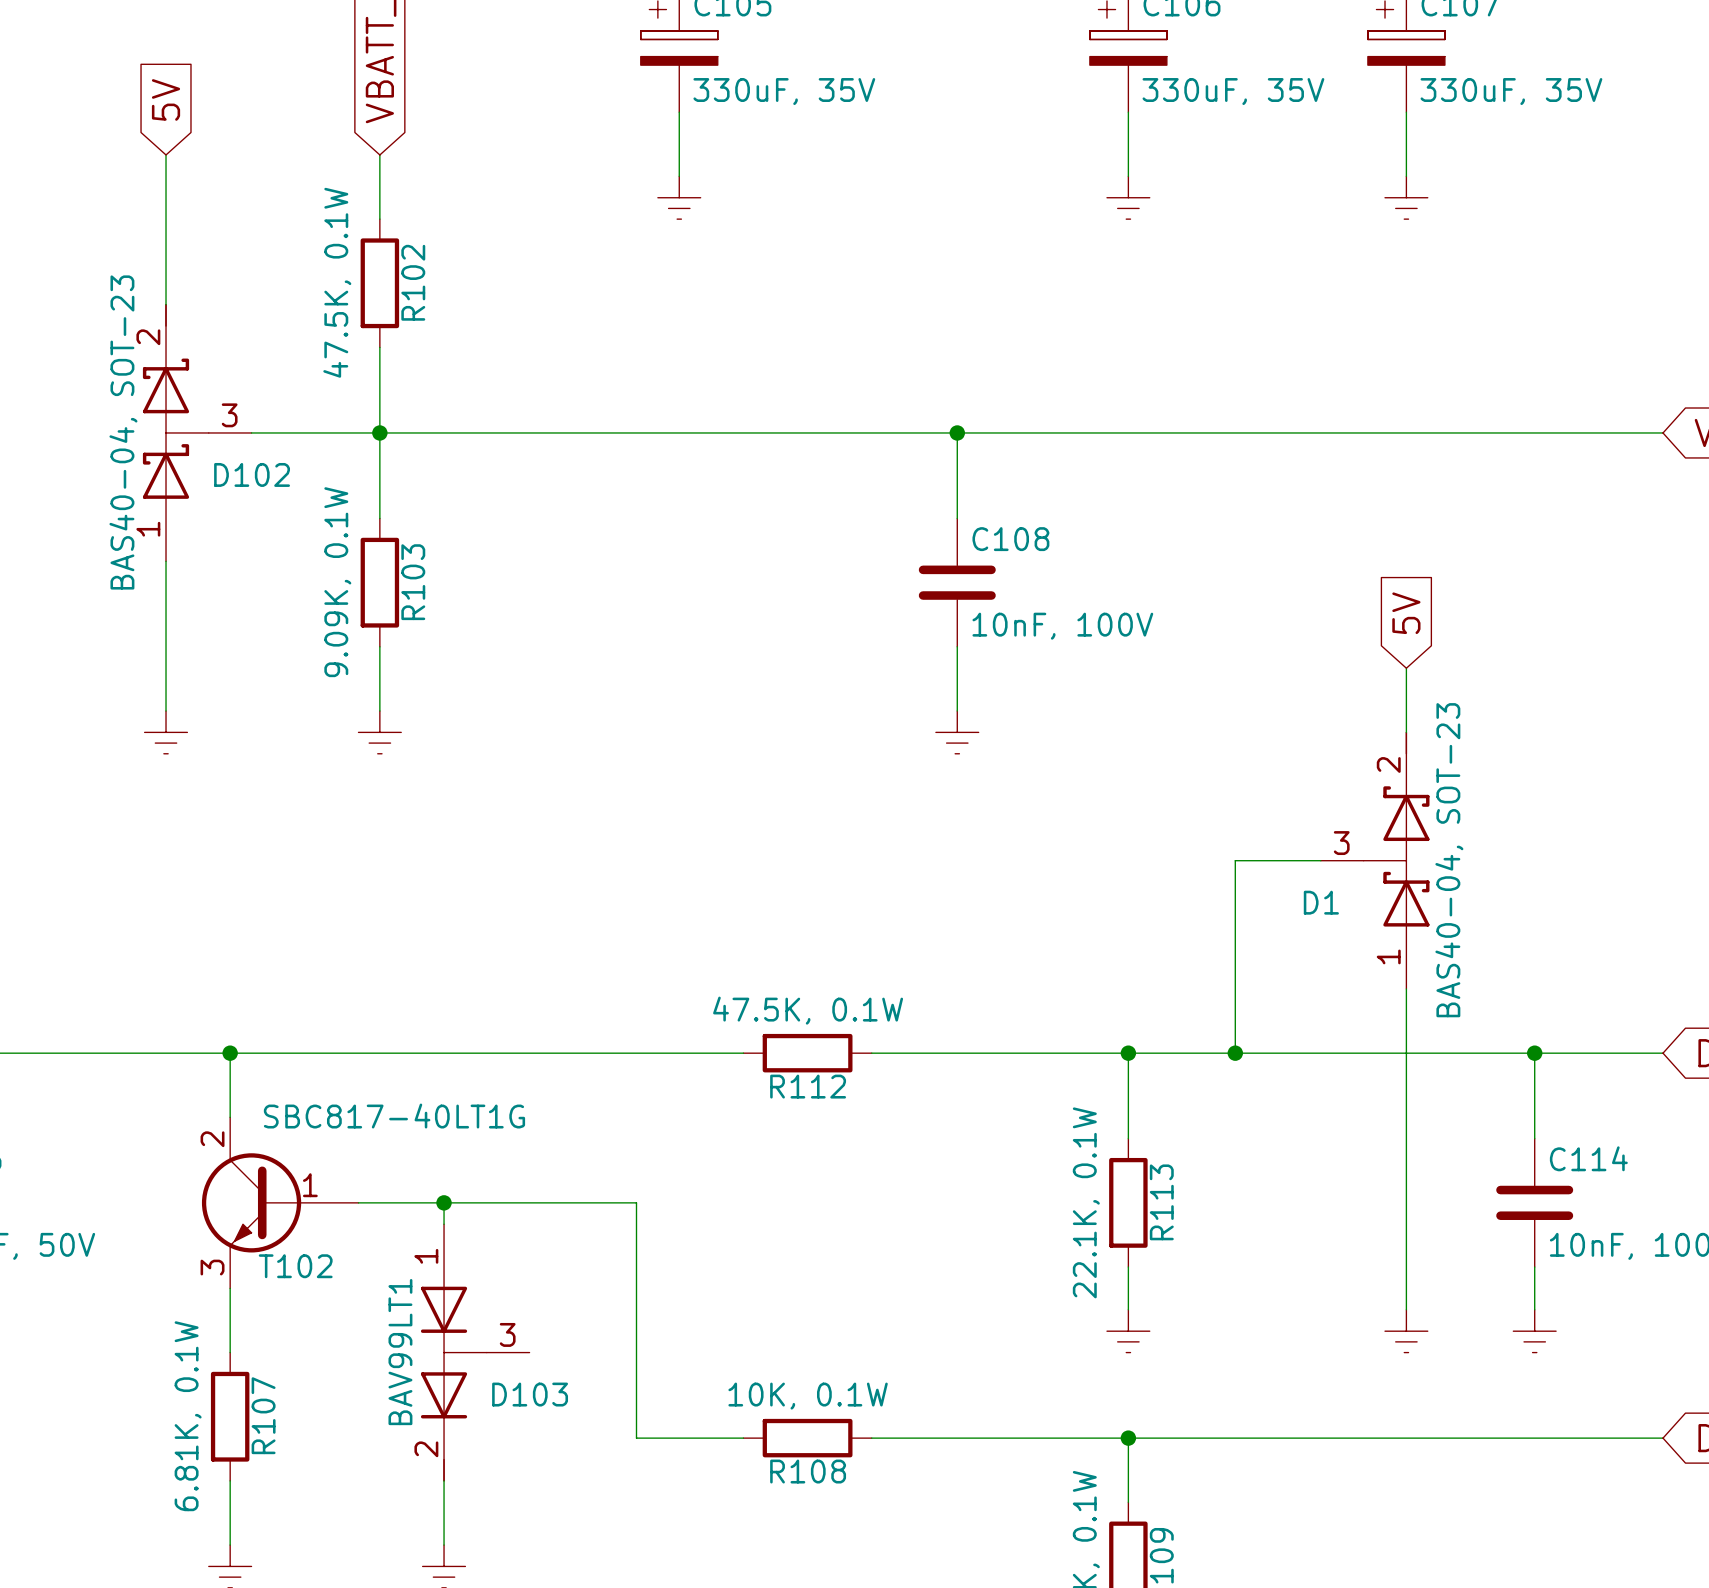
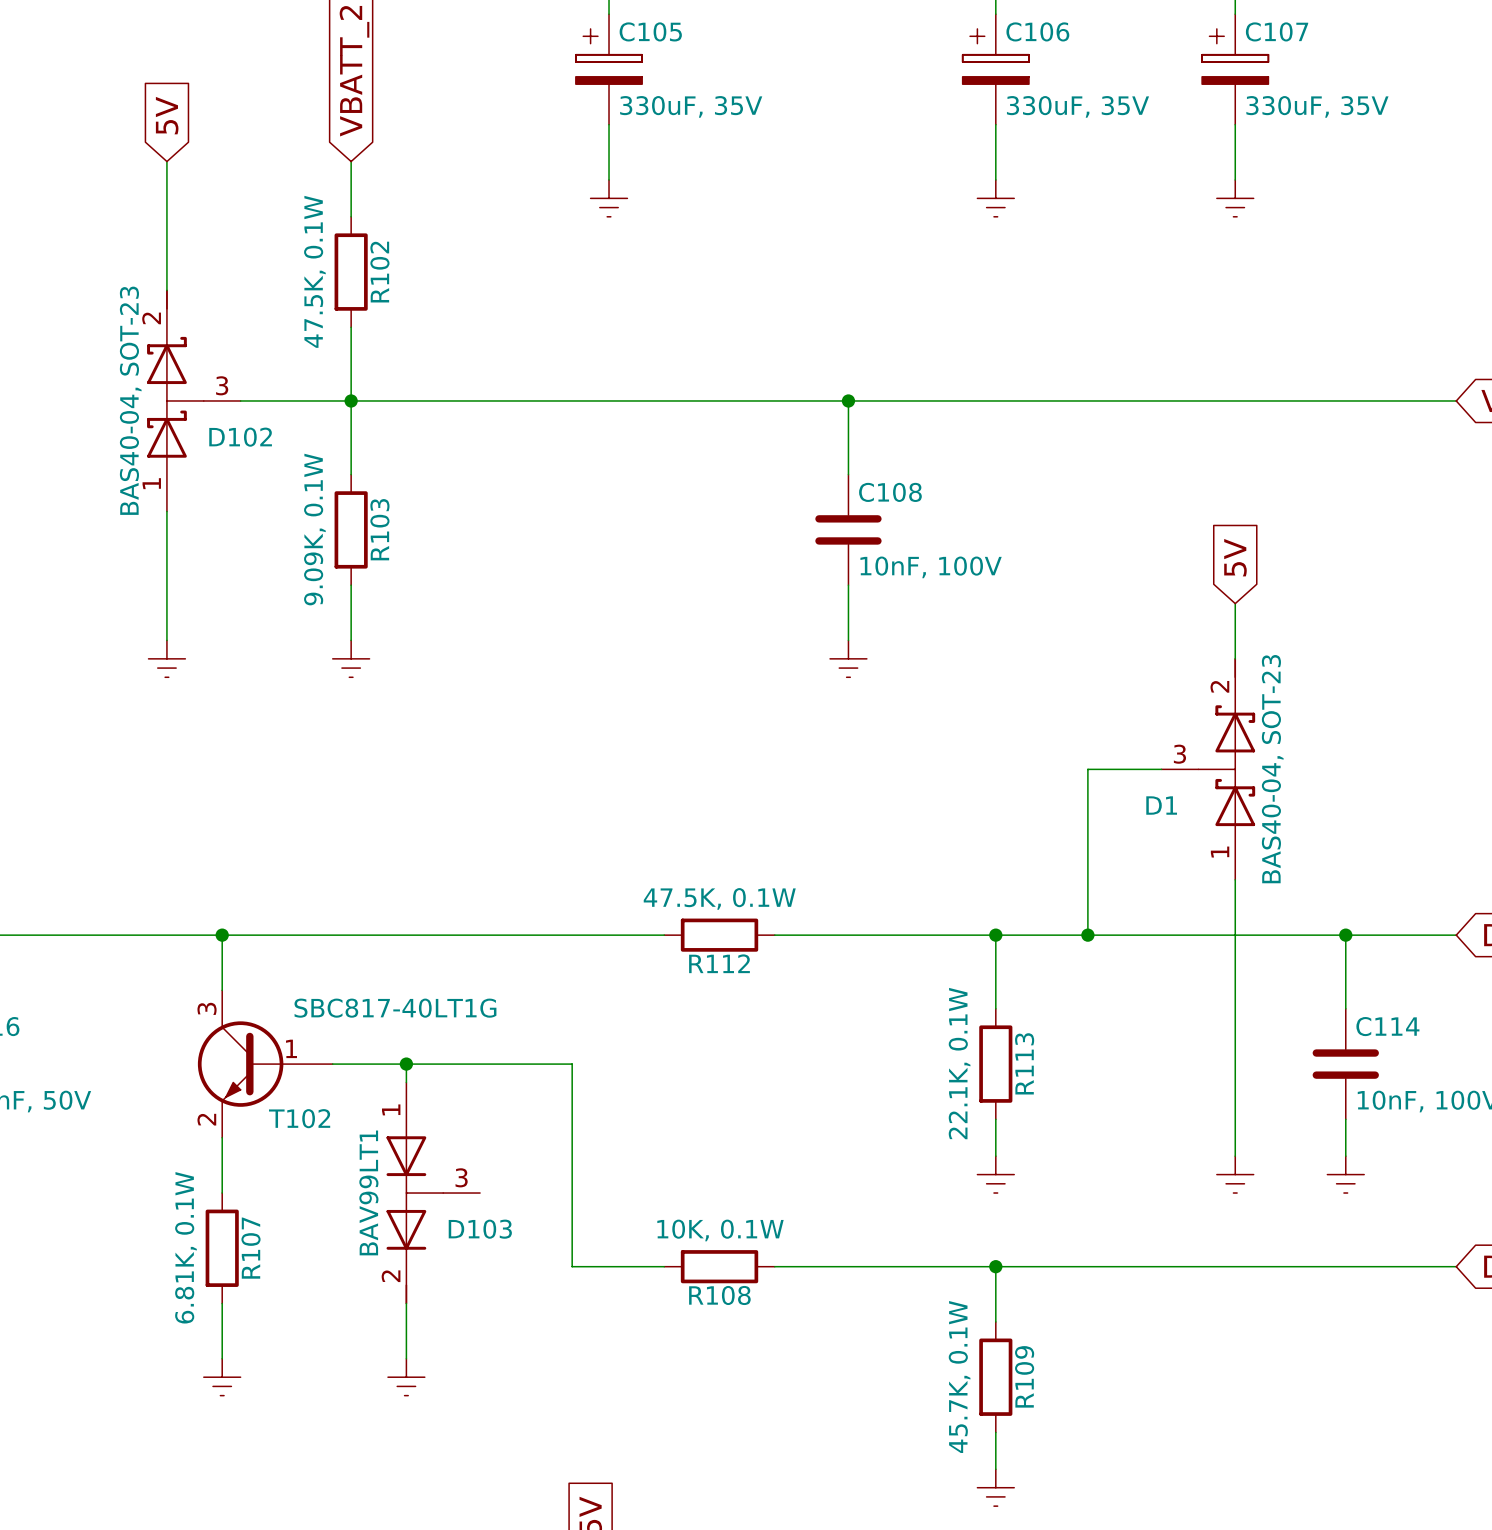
T102 value position: SBC817-40LT1G (394, 1116) -> SBC817-40LT1G (395, 1008)
T102 pin number: 2 (212, 1139) -> 3 (207, 1008)
T102 name position: T102 (295, 1266) -> T102 (299, 1118)
T102 pin number: 3 (212, 1267) -> 2 (206, 1119)

